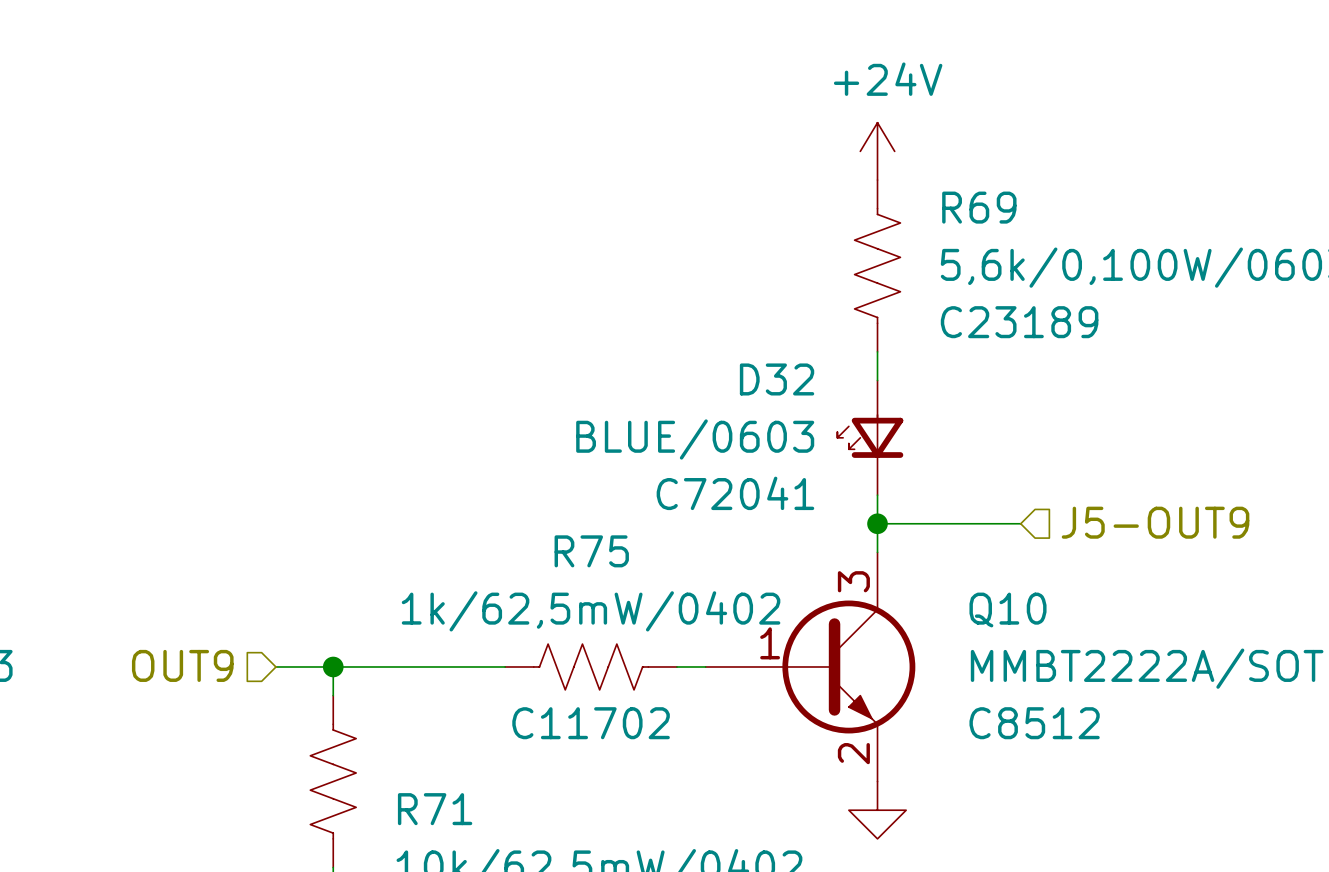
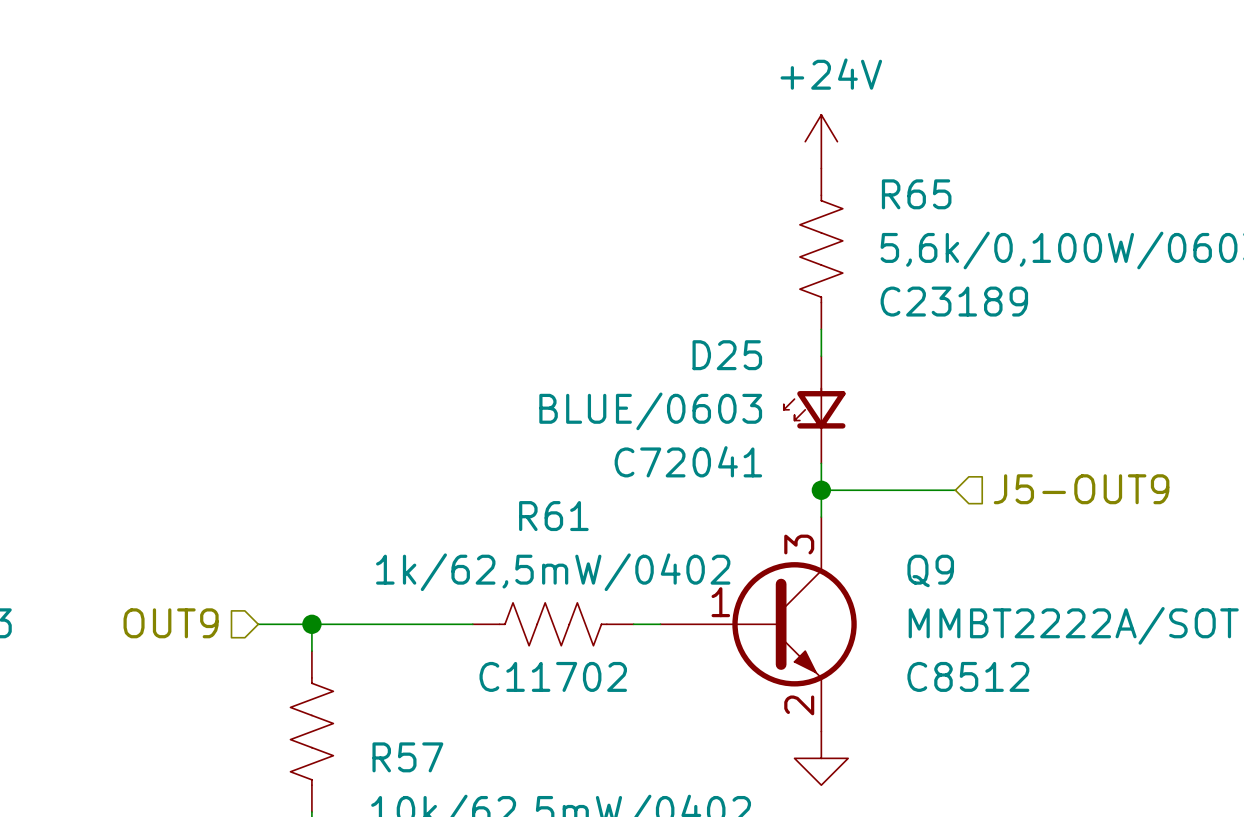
R69 name: R69 (979, 207) -> R65 (916, 194)
D32 name: D32 (777, 379) -> D25 (727, 355)
R75 name: R75 (591, 551) -> R61 (553, 516)
Q10 name: Q10 (1007, 609) -> Q9 (930, 570)
R71 name: R71 (435, 809) -> R57 (407, 757)

